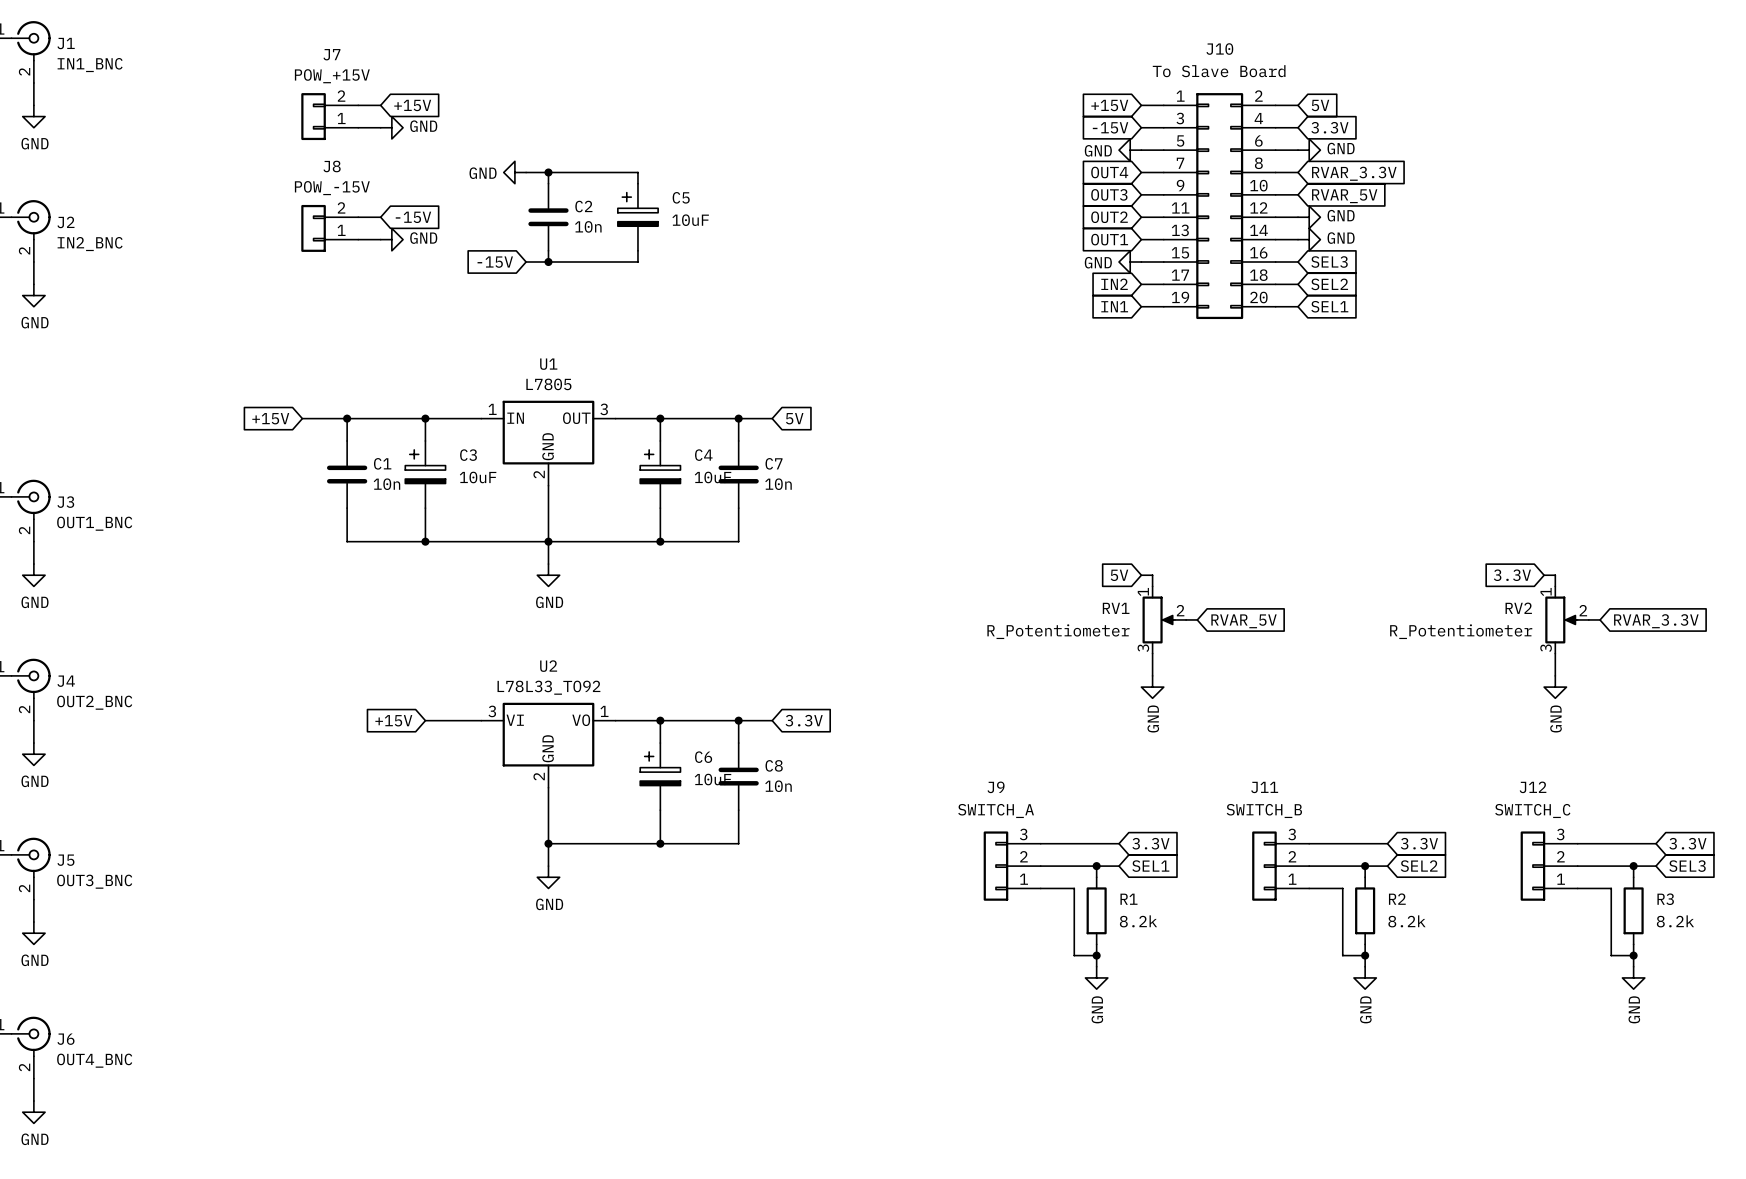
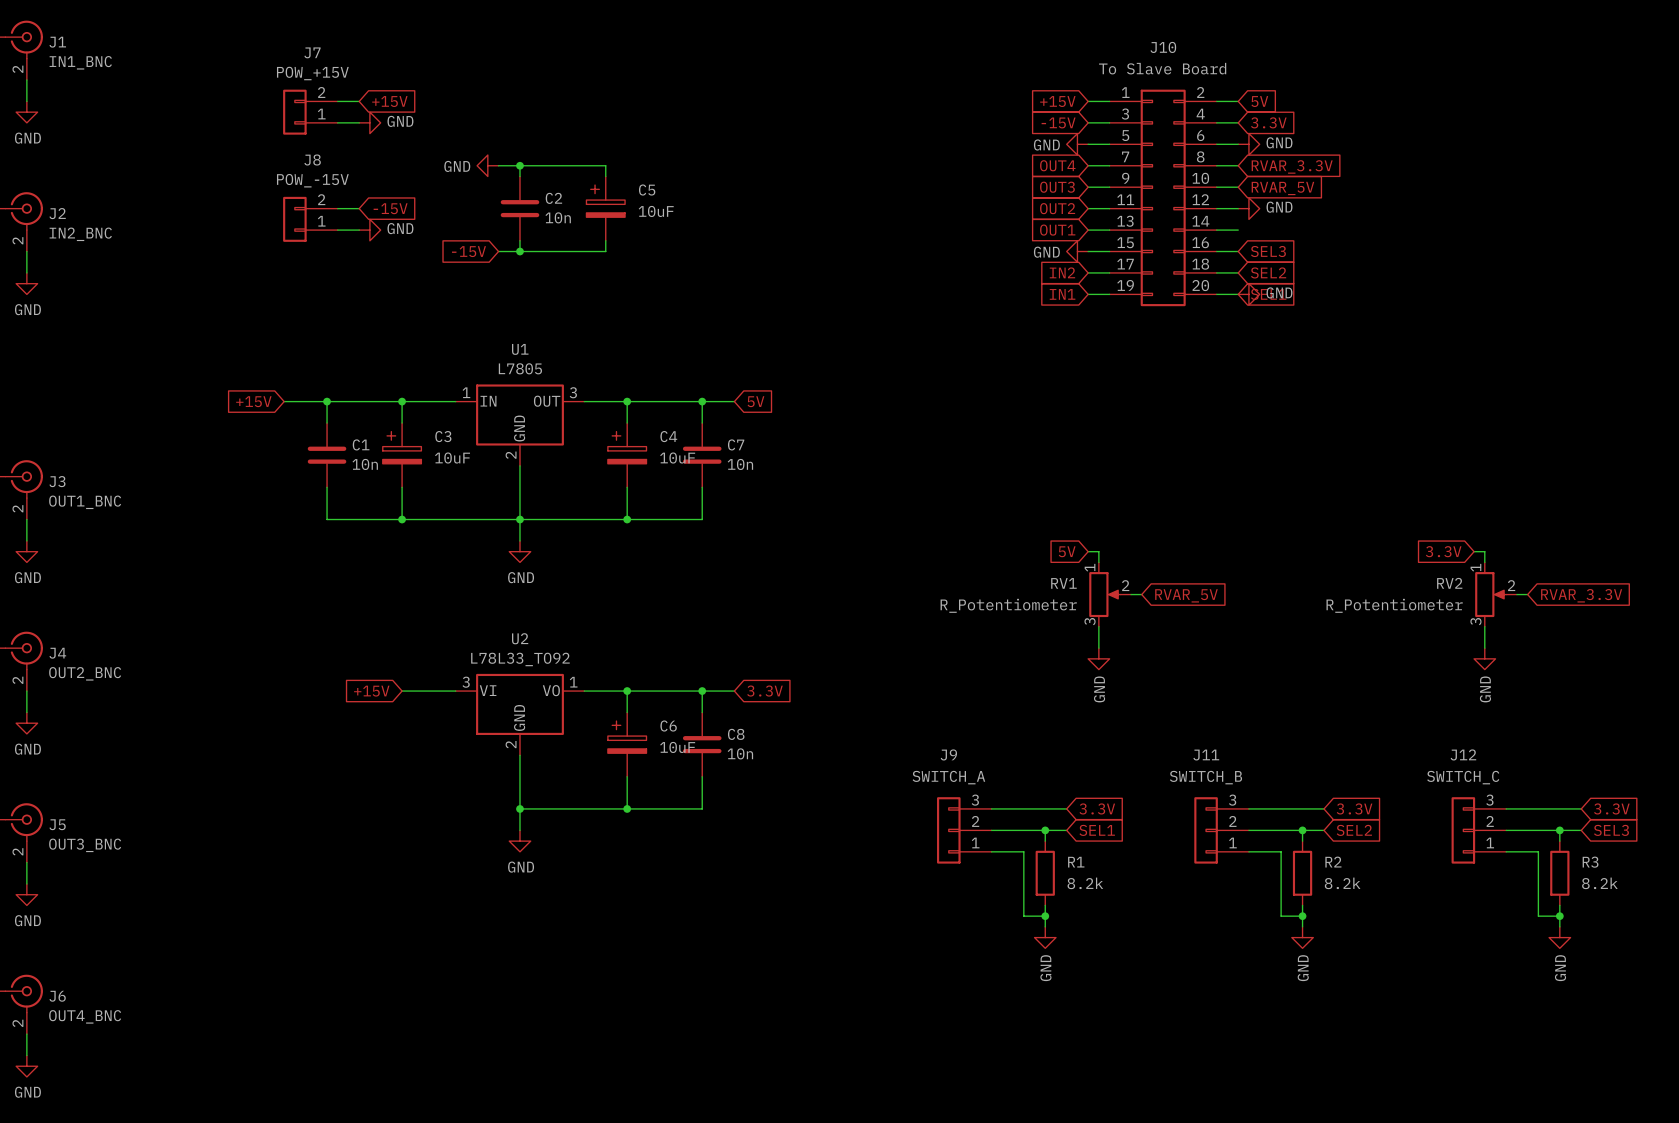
power symbol position: GND (1309, 239) -> GND (1248, 294)

